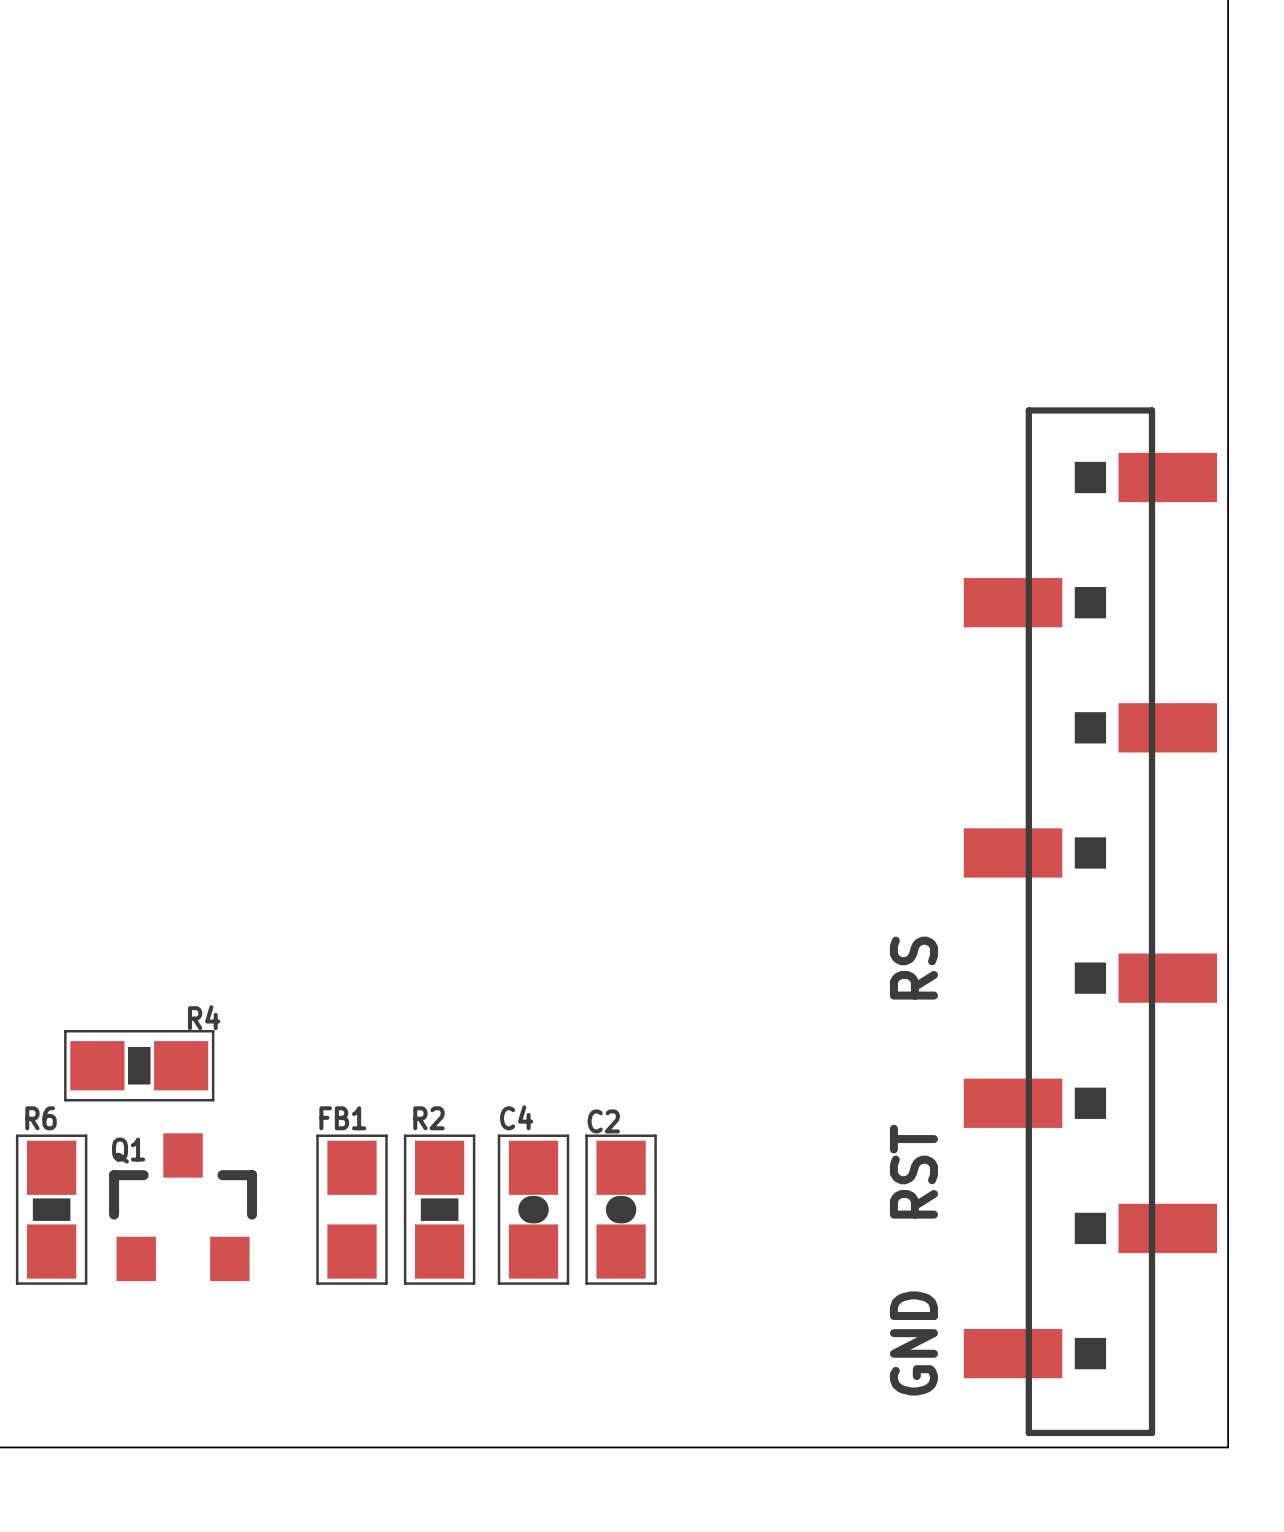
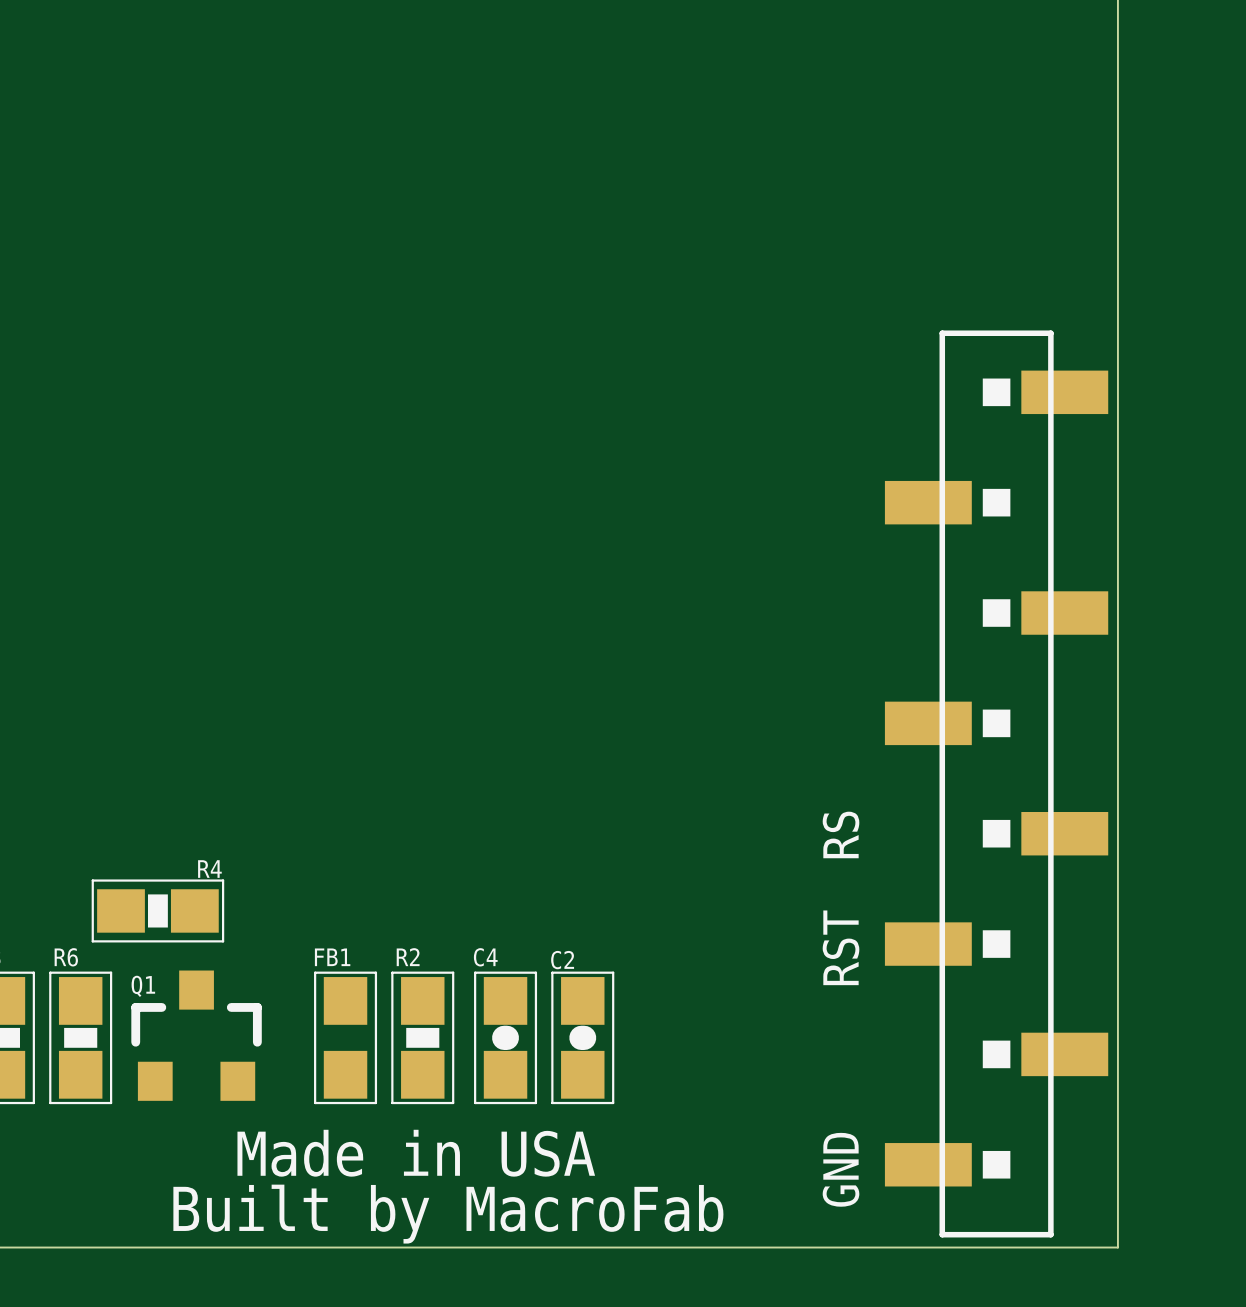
text position: RST (913, 1171) -> RST (841, 947)
text: none -> Made in USA (416, 1153)
text: none -> Built by MacroFab (448, 1214)

